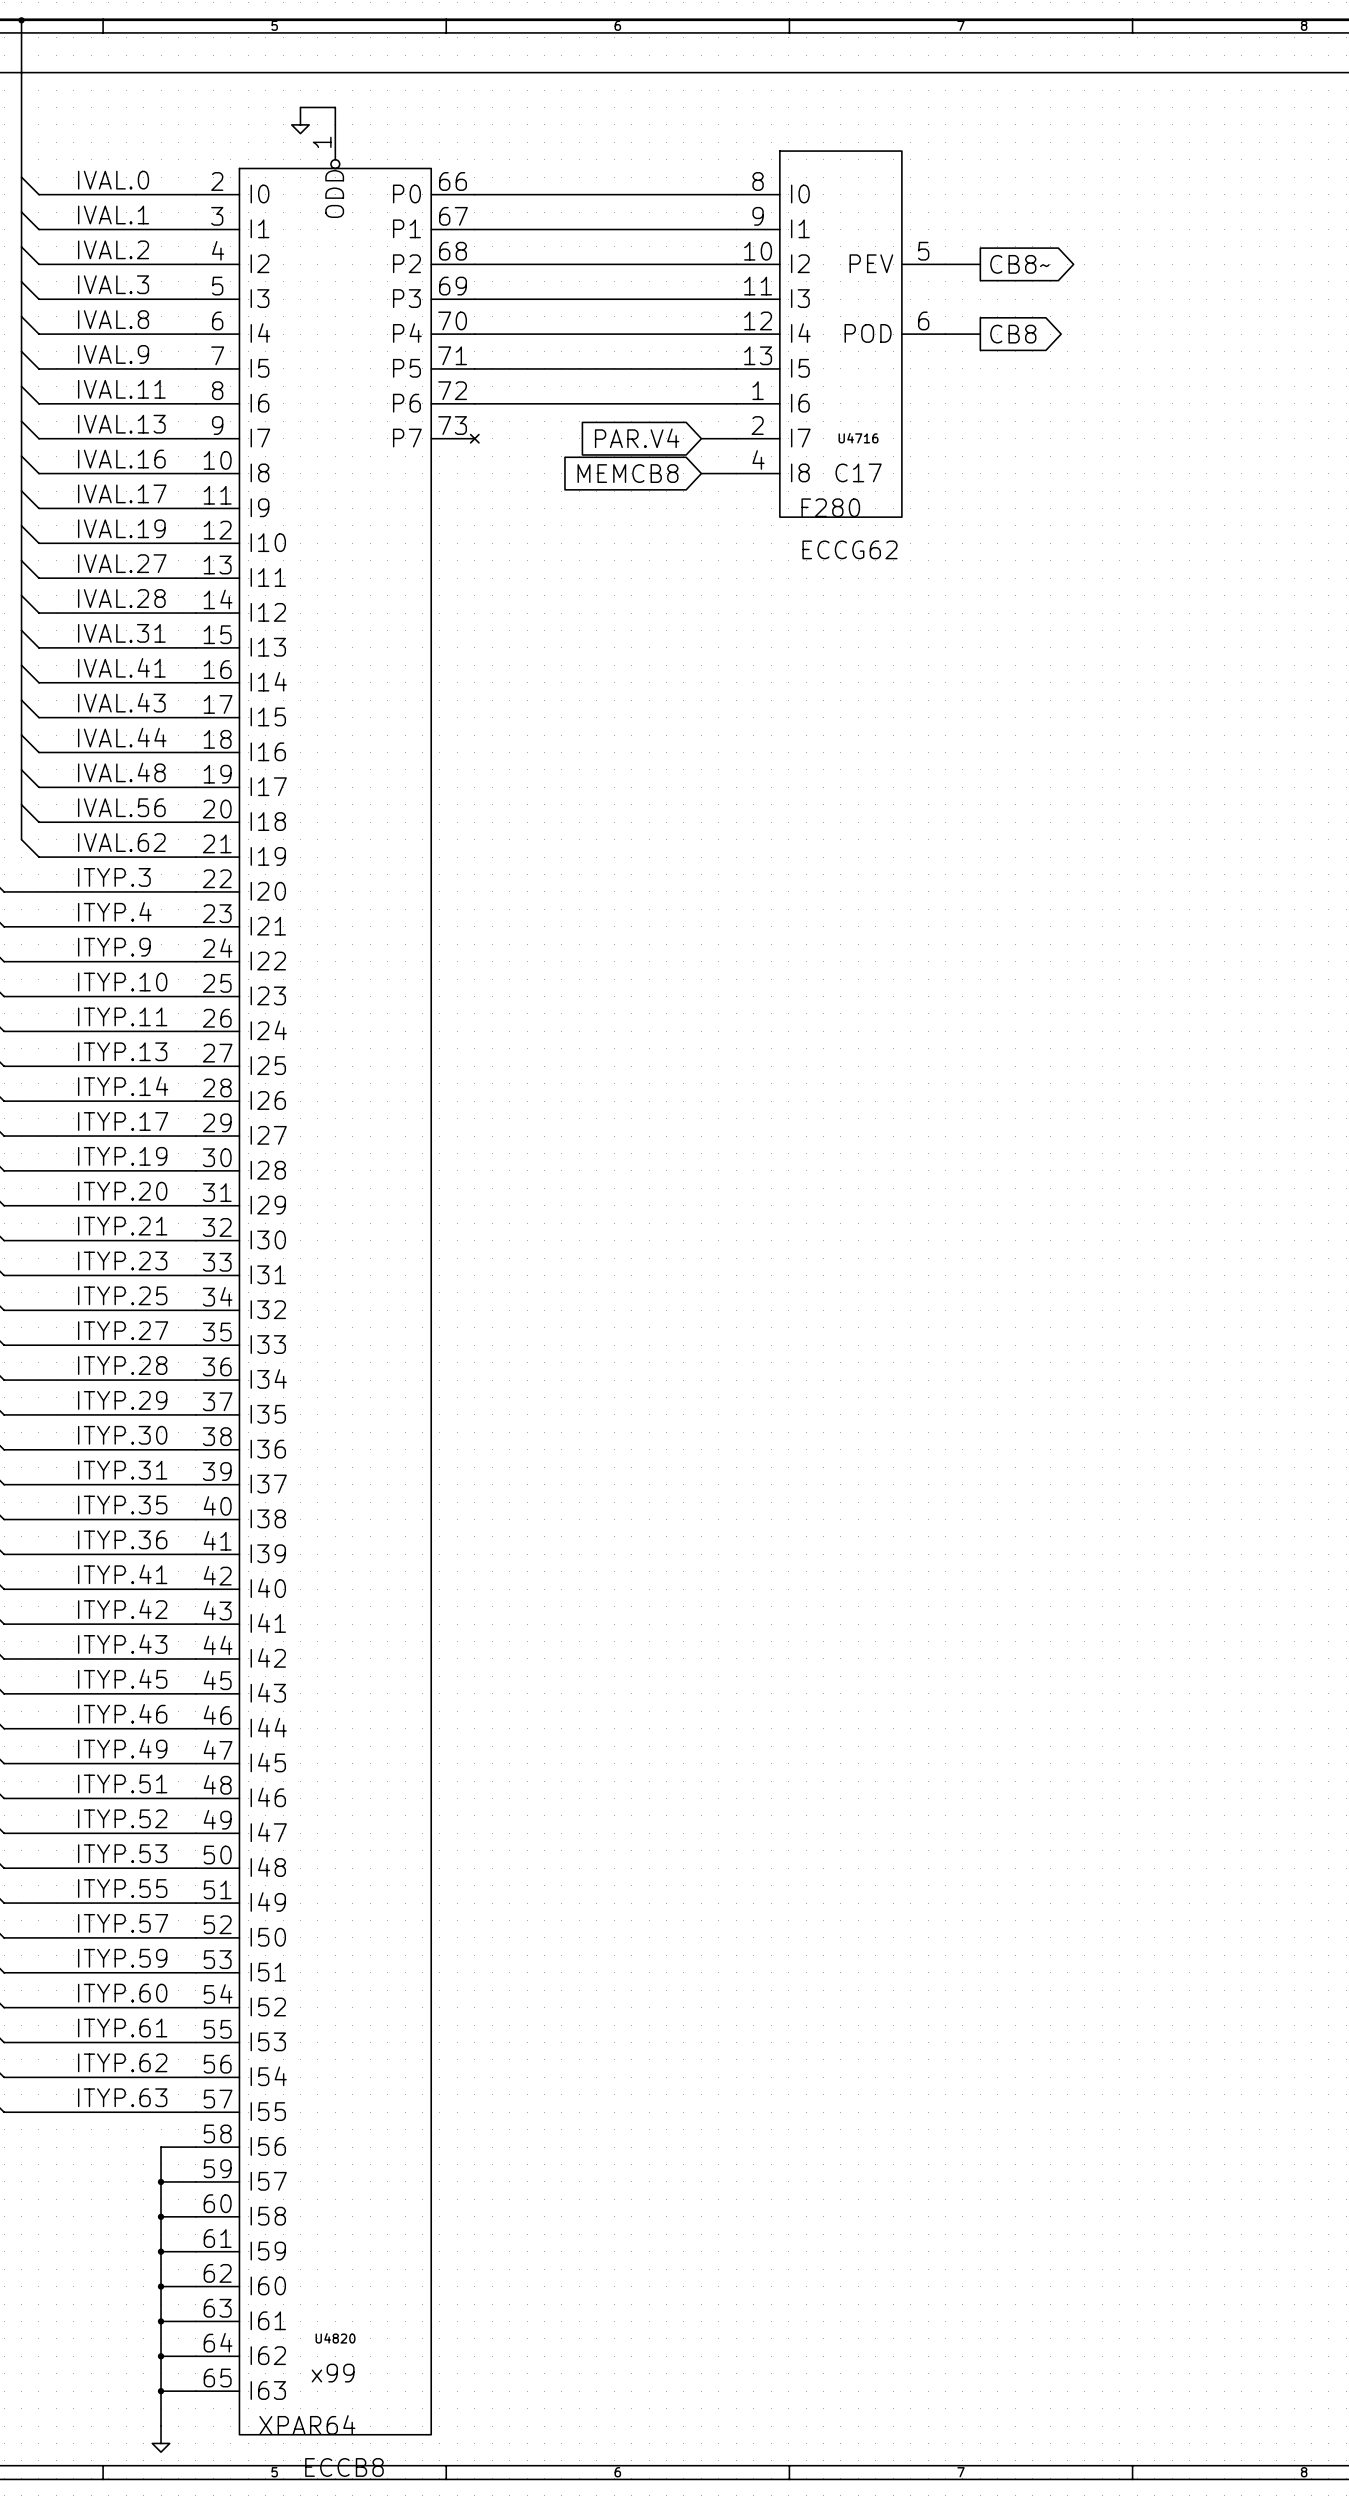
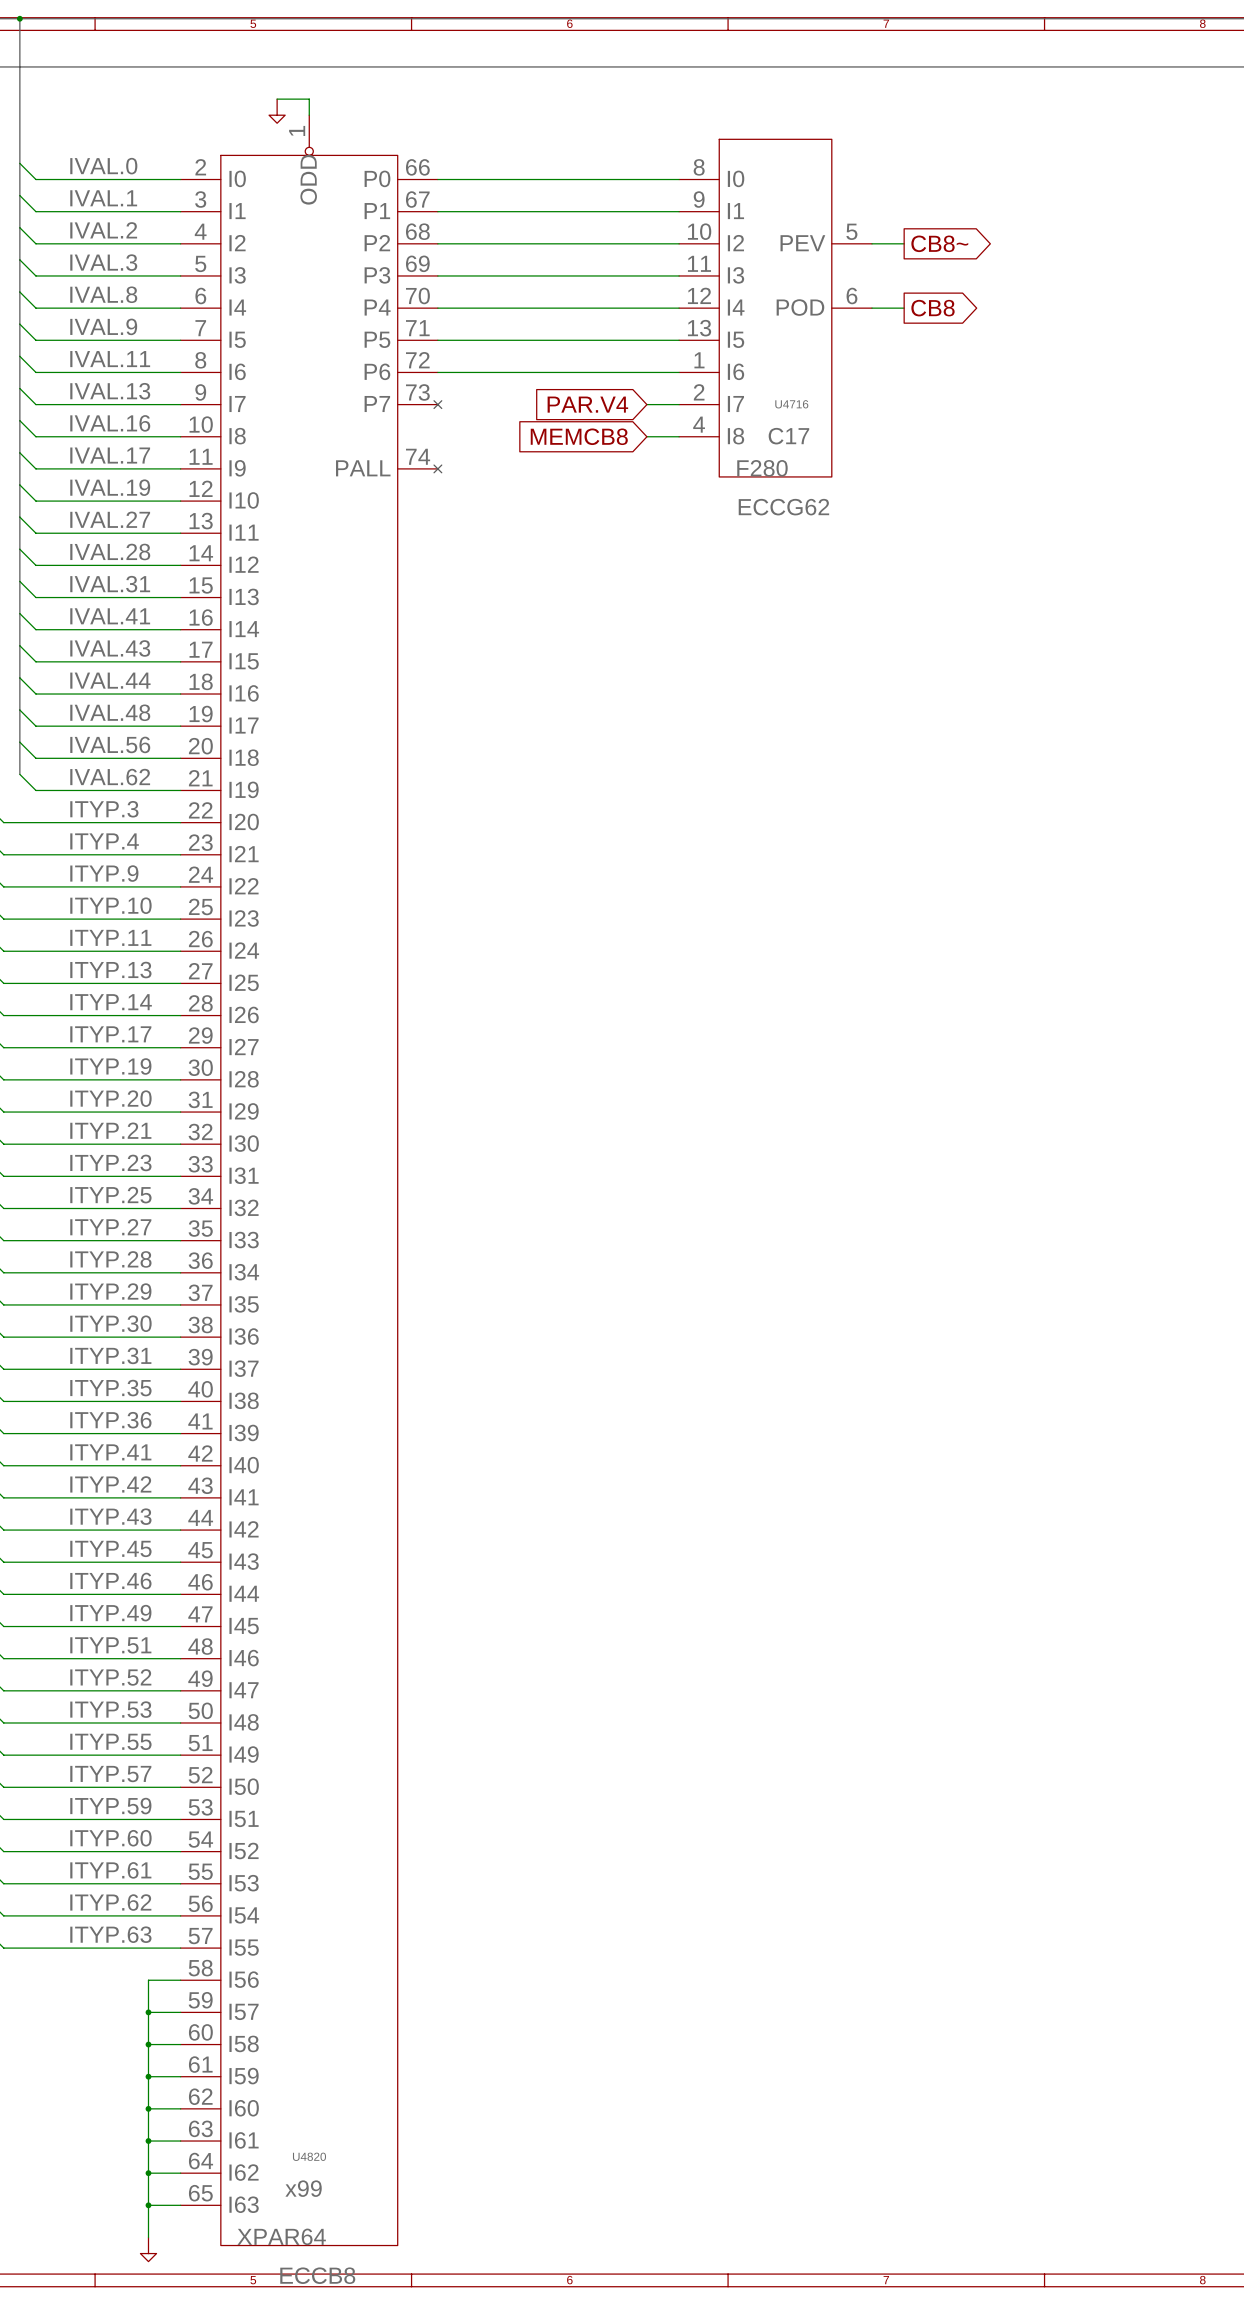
U4820 symbol: [195, 124, 475, 2435] -> [180, 115, 438, 2246]
no-connect mark: none -> (437, 468)

